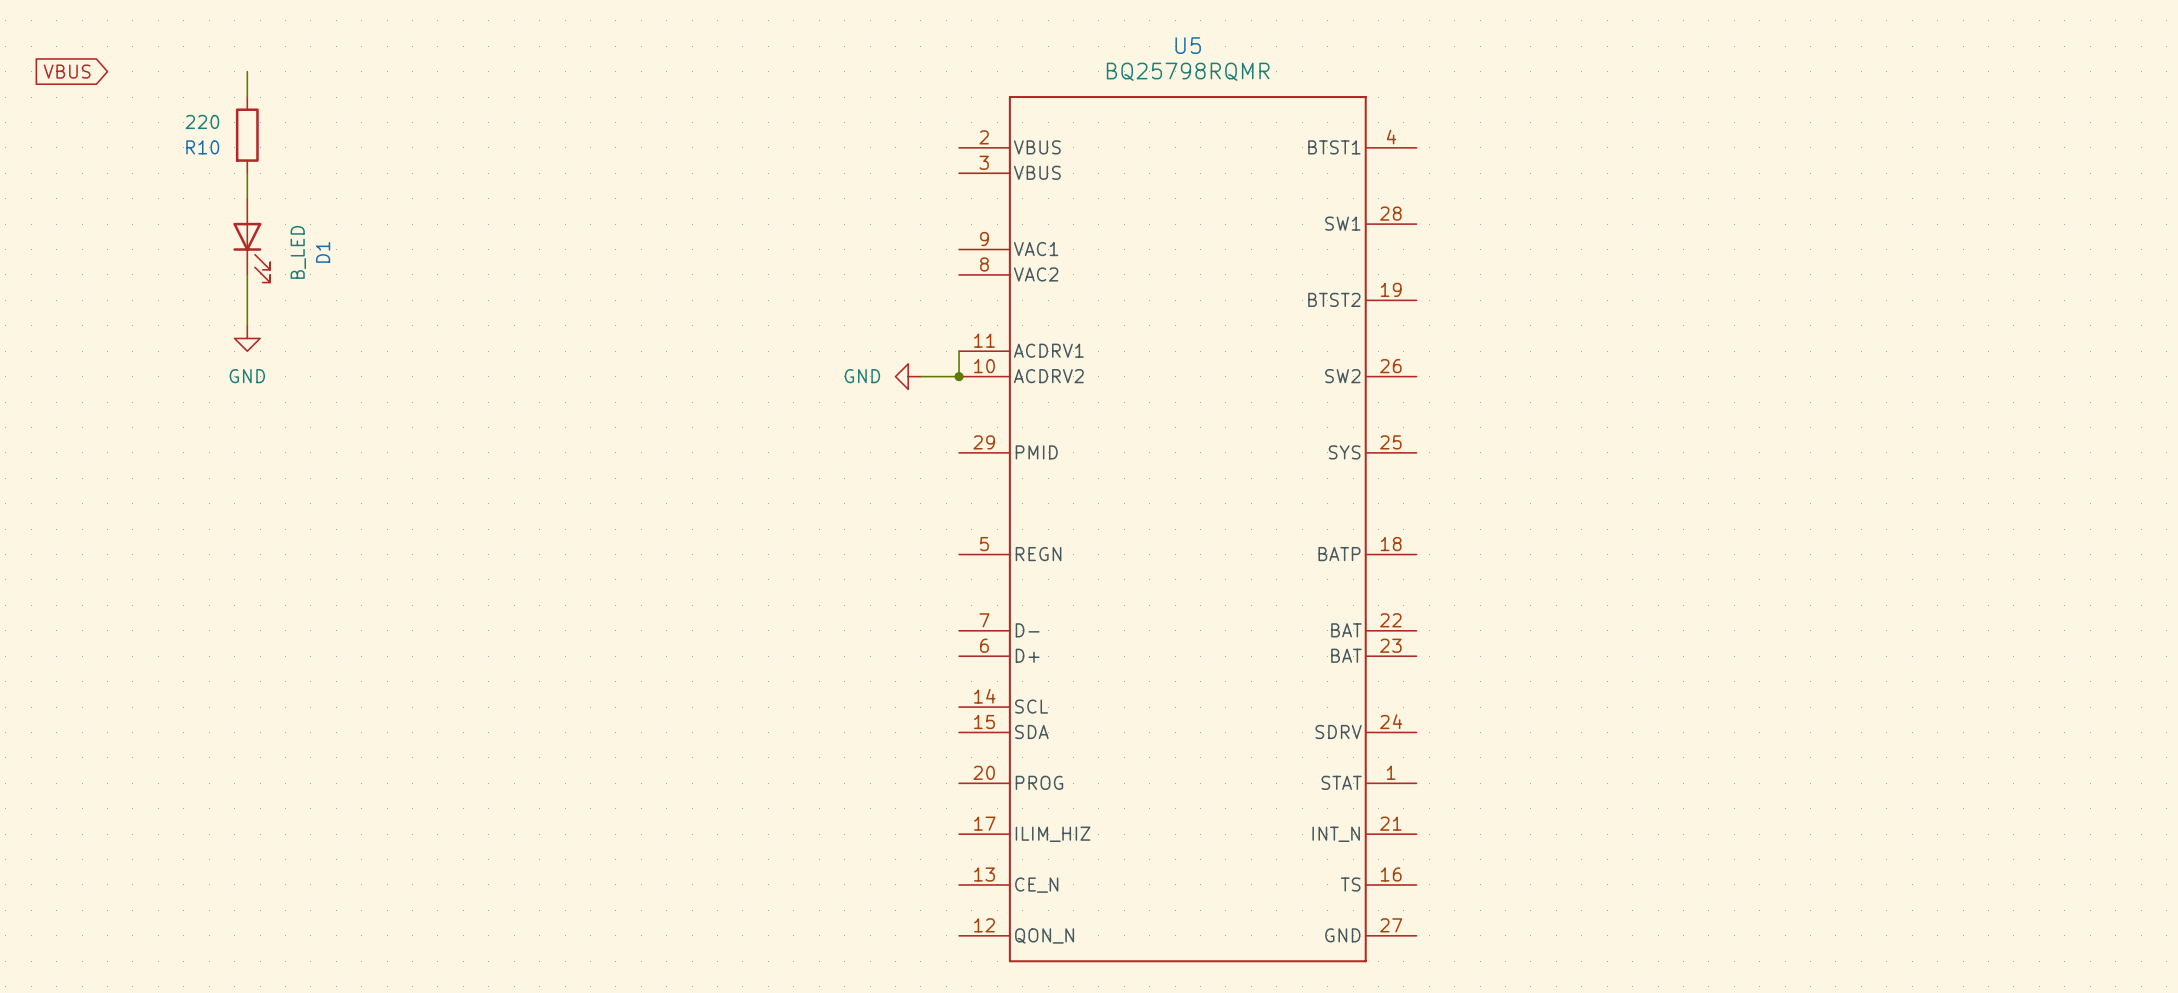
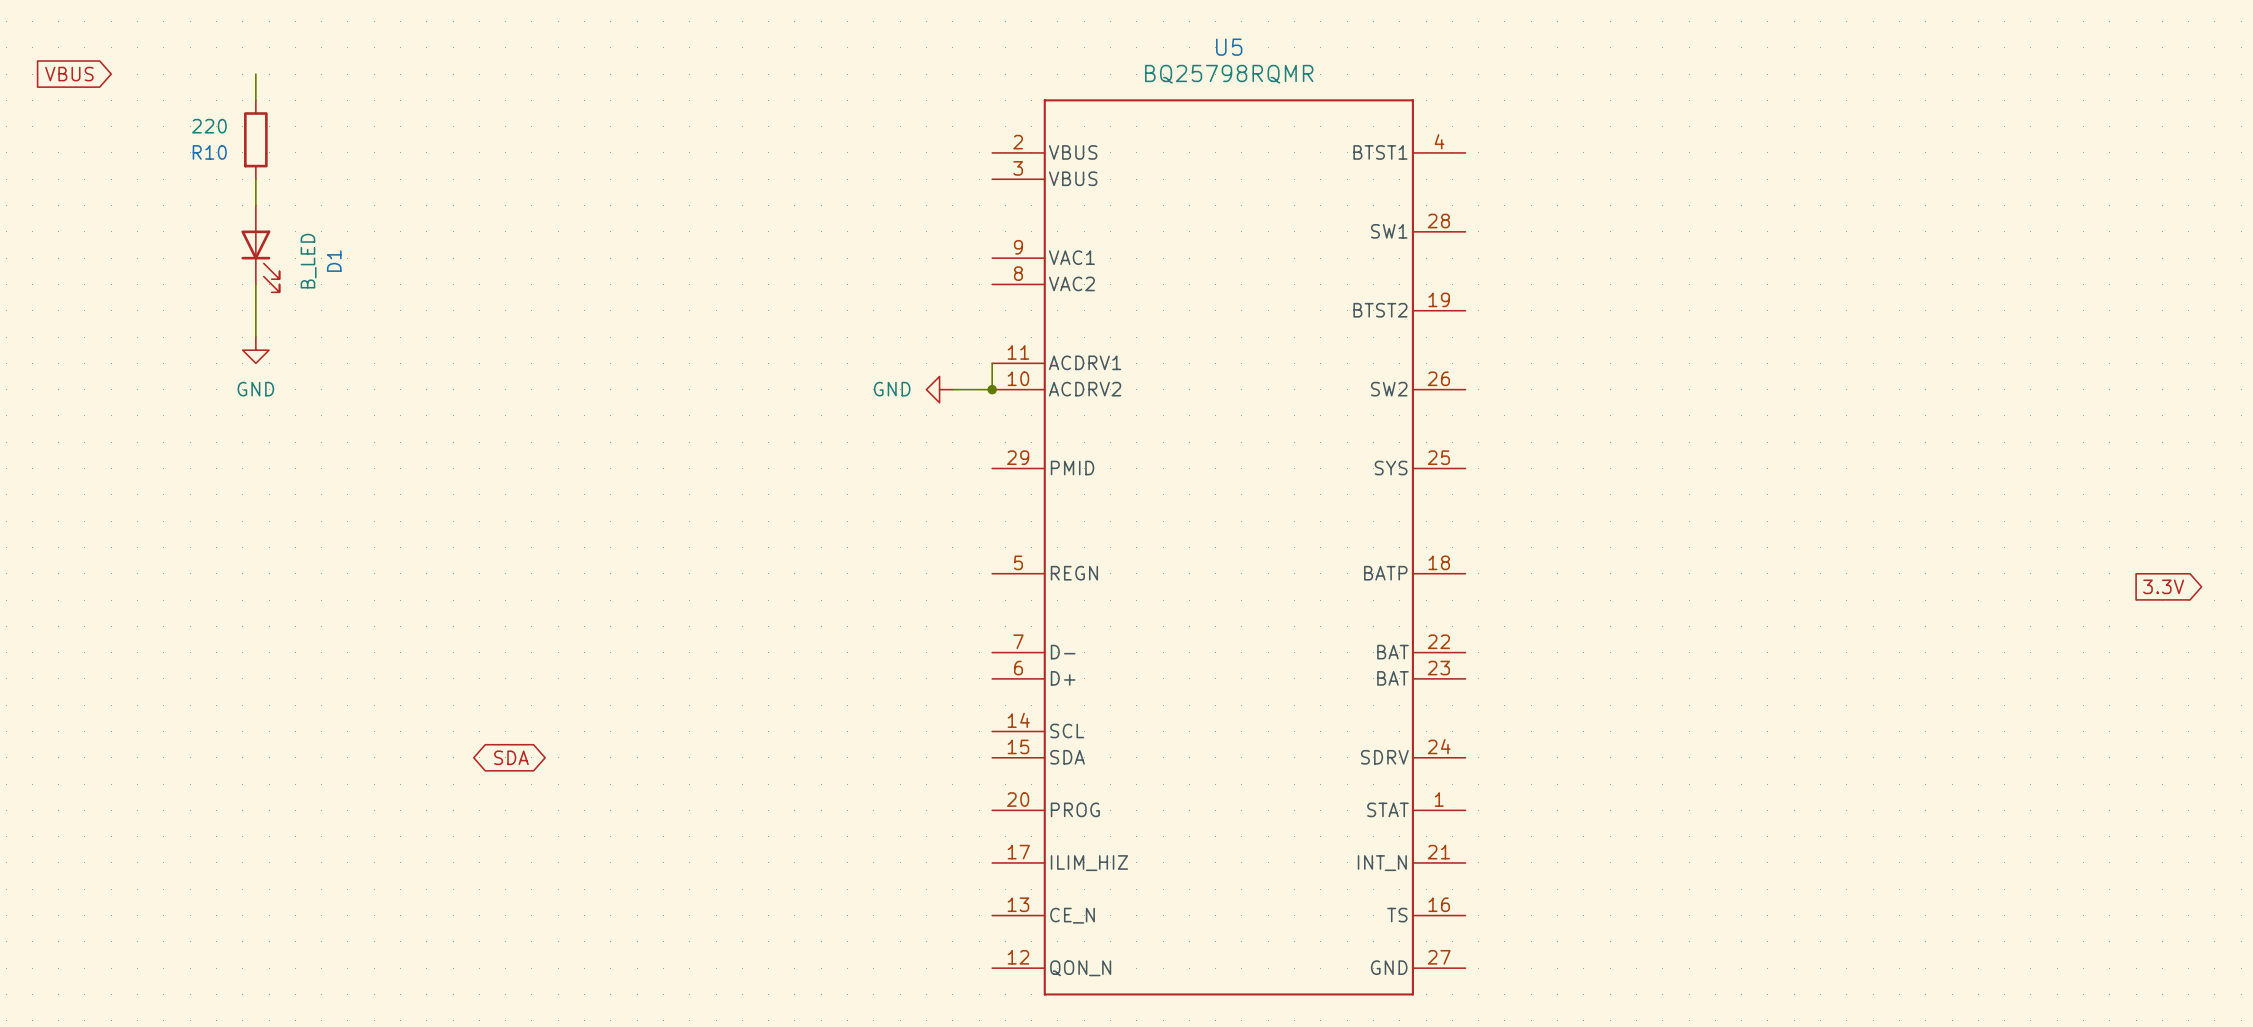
global label: none -> 3.3V (2163, 586)
global label: none -> SDA (511, 757)

